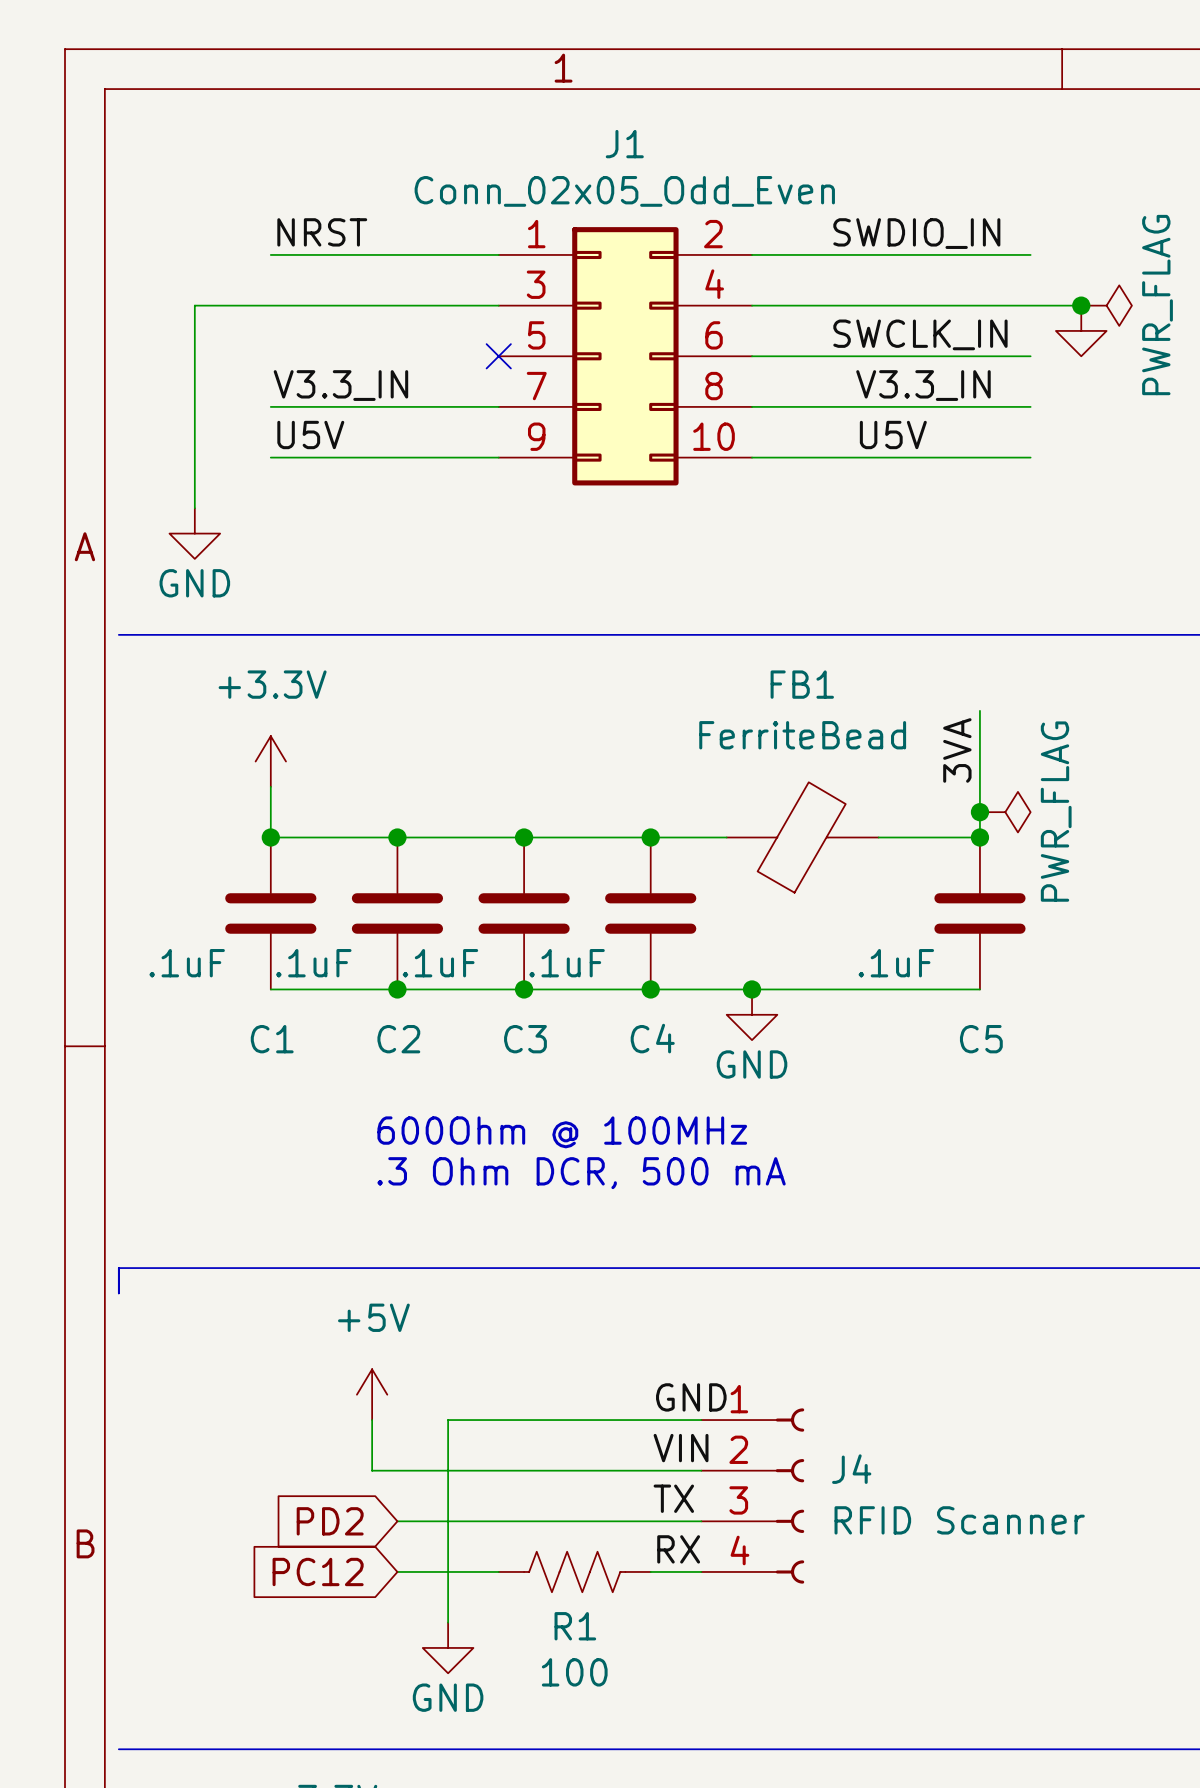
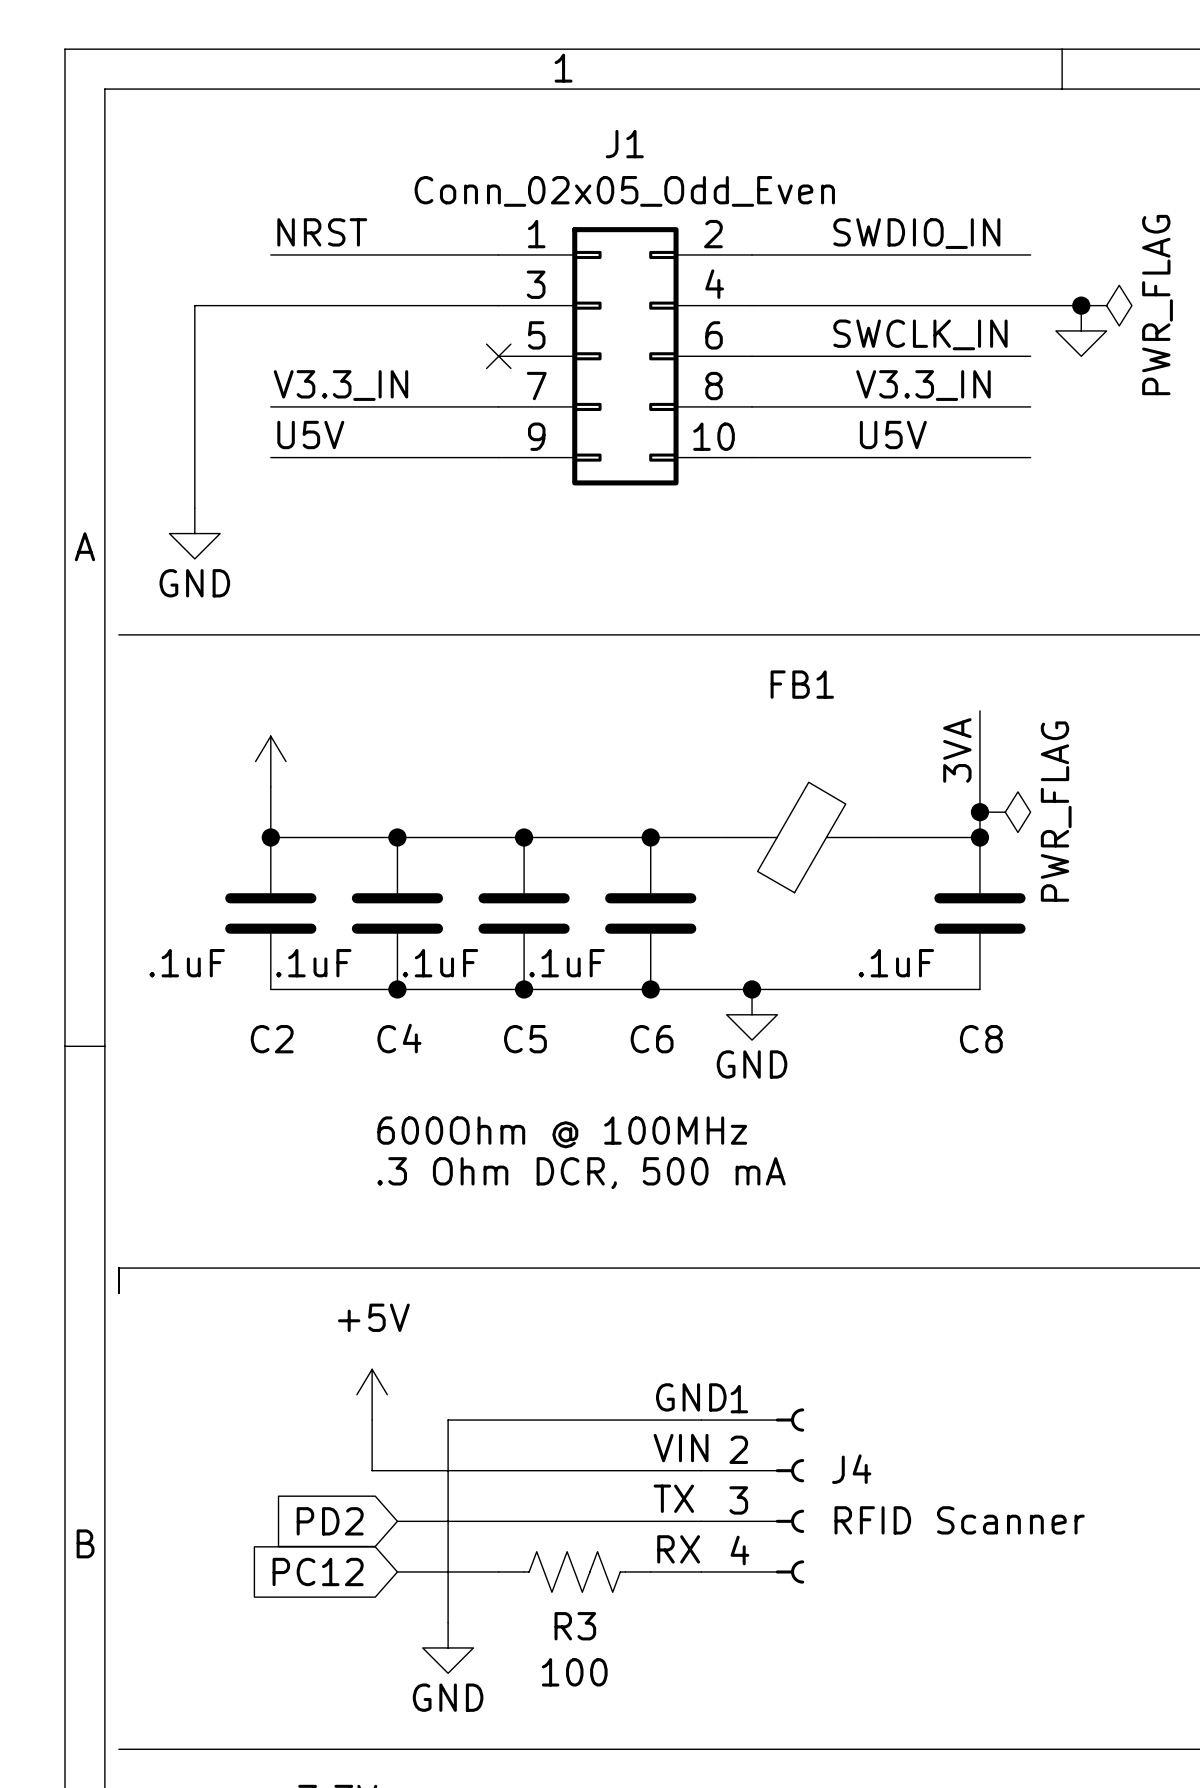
power symbol text: +3.3V (272, 684) -> none
FB1 value: FerriteBead (802, 735) -> none
C4 name: C4 (652, 1038) -> C6 (652, 1039)
C1 name: C1 (272, 1039) -> C2 (272, 1039)
C2 name: C2 (398, 1039) -> C4 (399, 1038)
C3 name: C3 (525, 1039) -> C5 (525, 1039)
C5 name: C5 (981, 1039) -> C8 (981, 1039)
R1 name: R1 (575, 1626) -> R3 (575, 1626)

